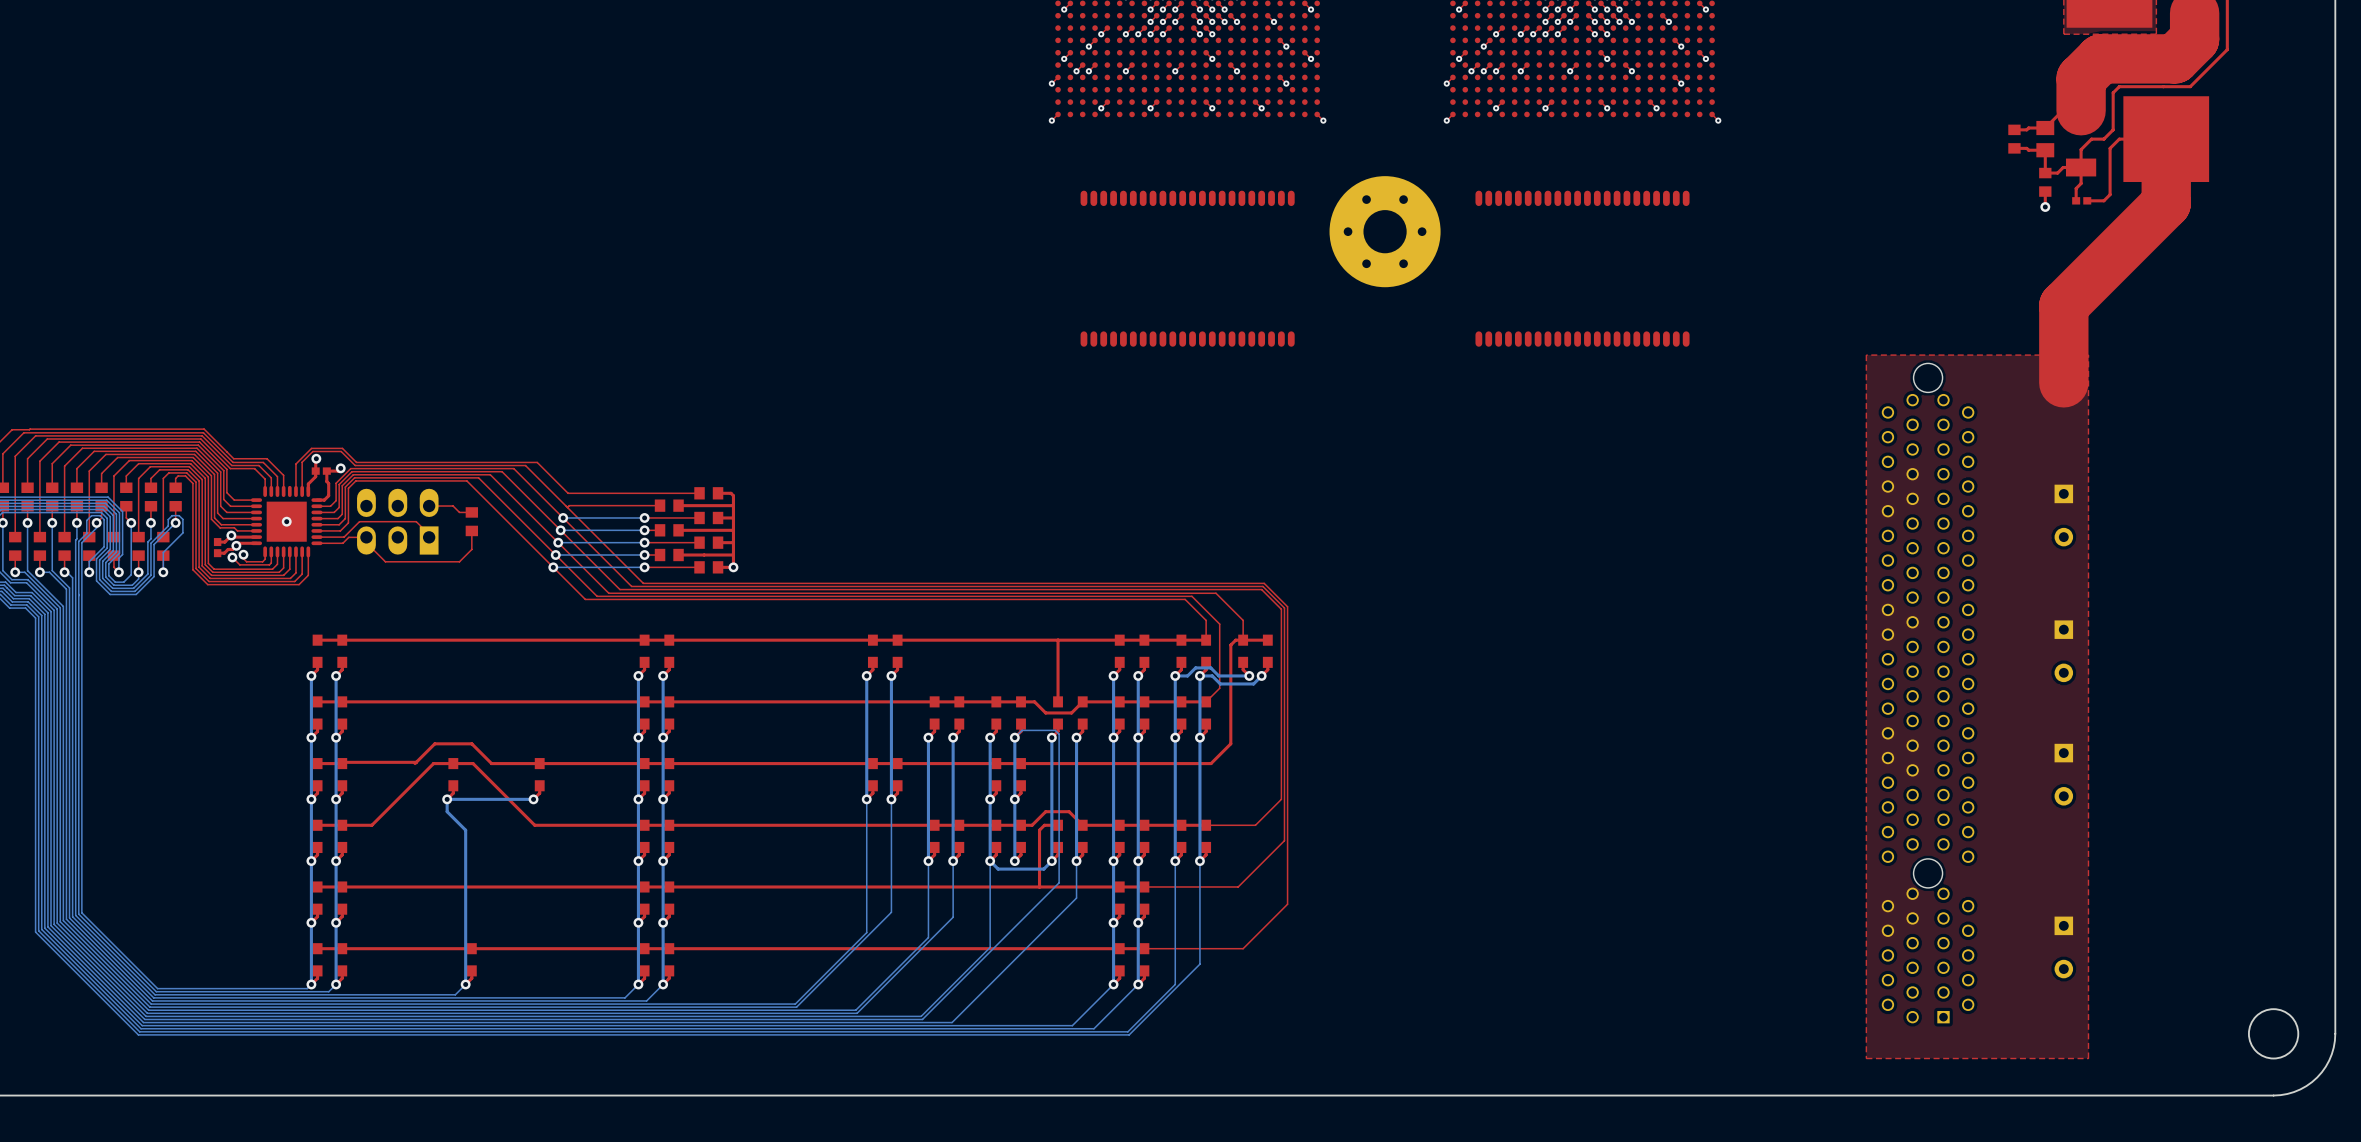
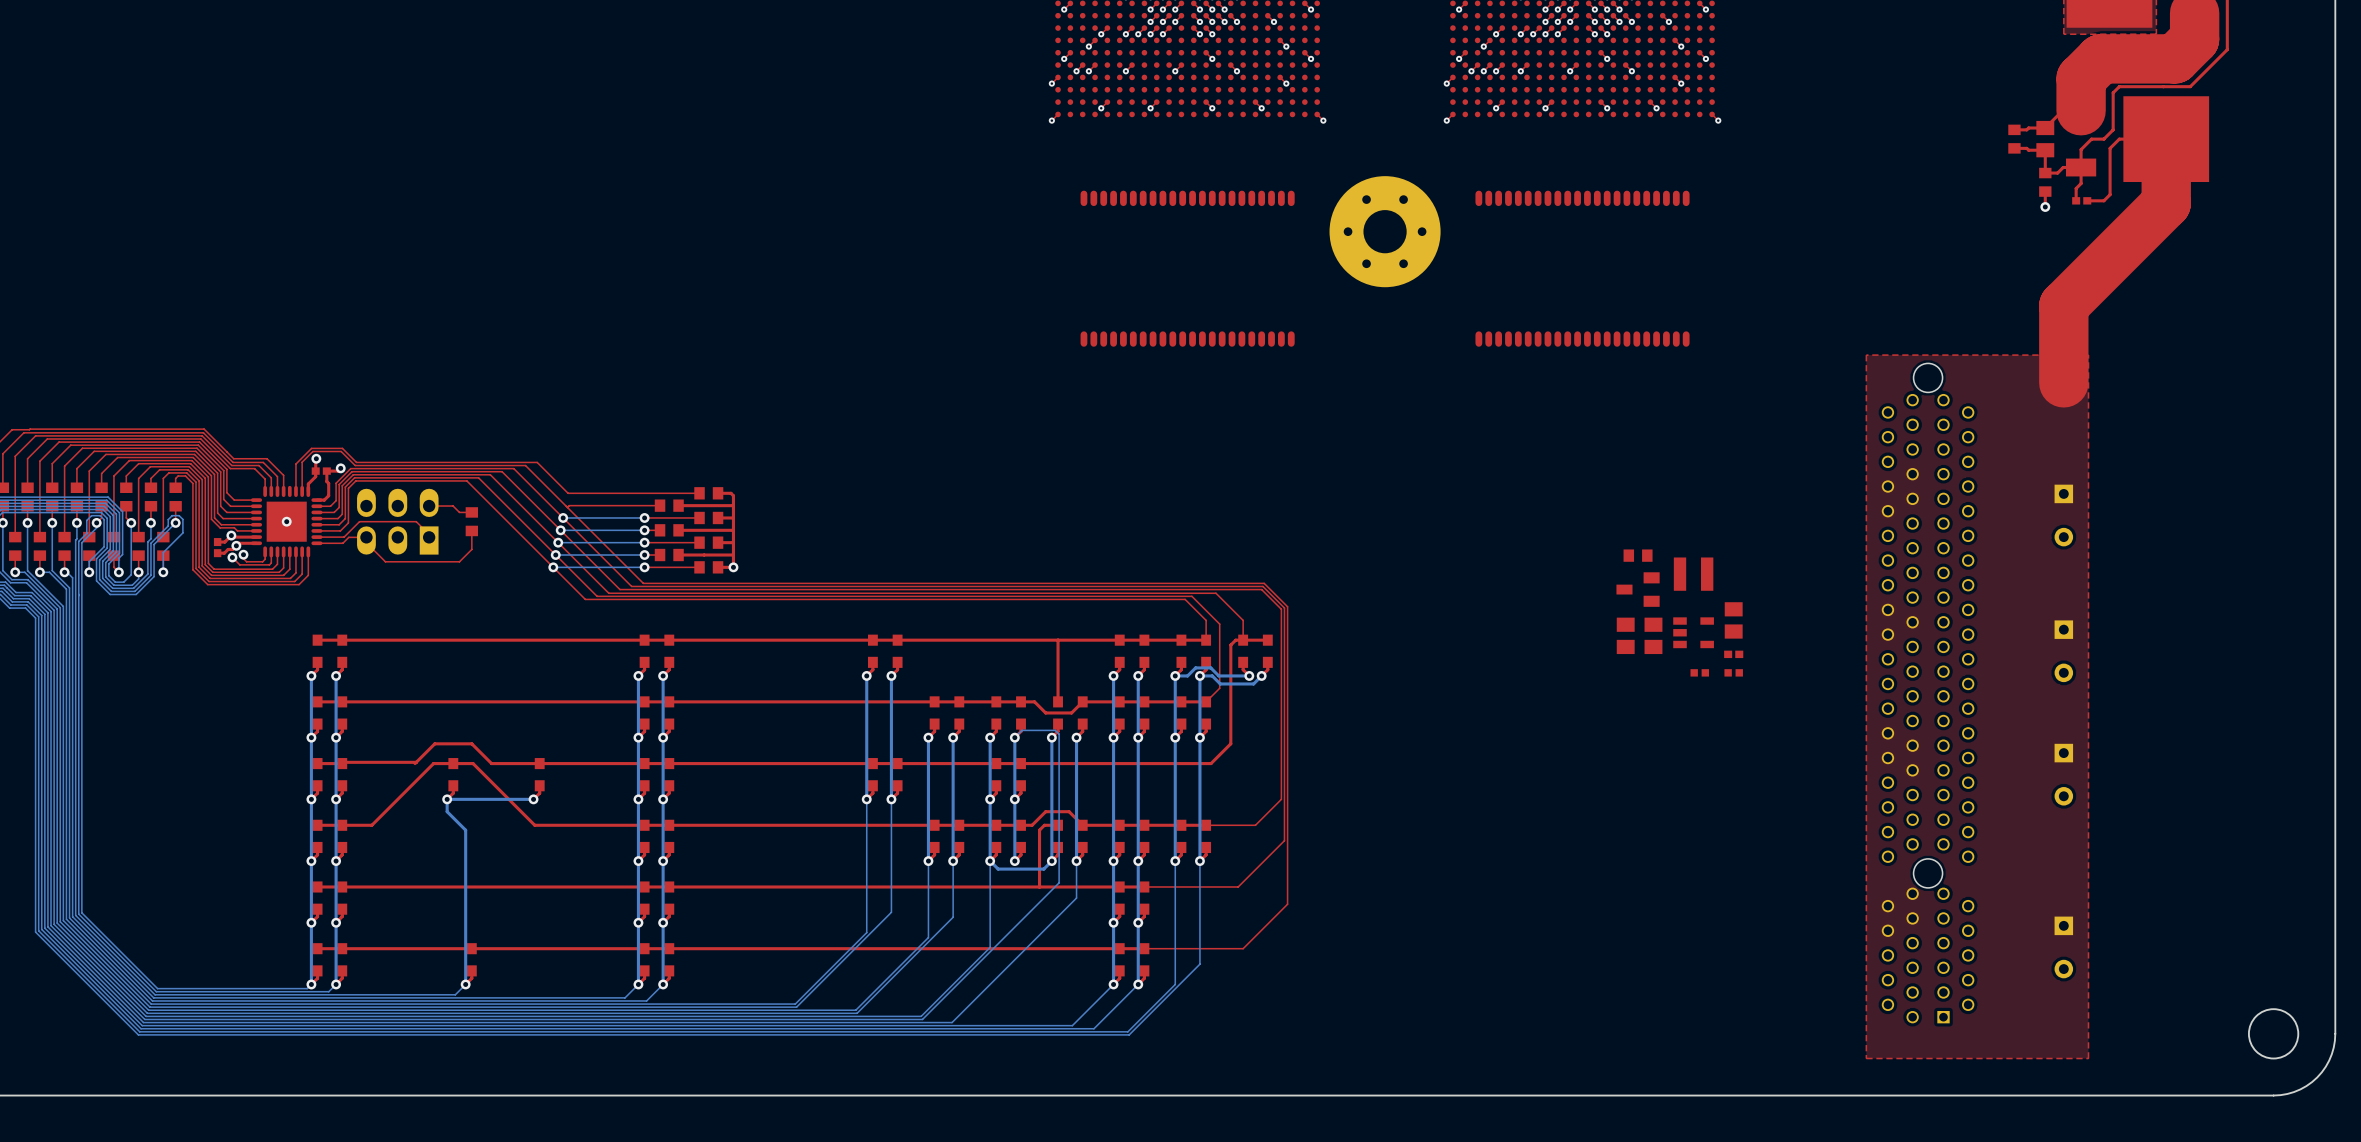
part: none -> (1638, 555)
part: none -> (1693, 574)
part: none -> (1638, 589)
part: none -> (1733, 620)
part: none -> (1693, 632)
part: none -> (1625, 635)
part: none -> (1653, 635)
part: none -> (1733, 654)
part: none -> (1699, 672)
part: none -> (1733, 672)

